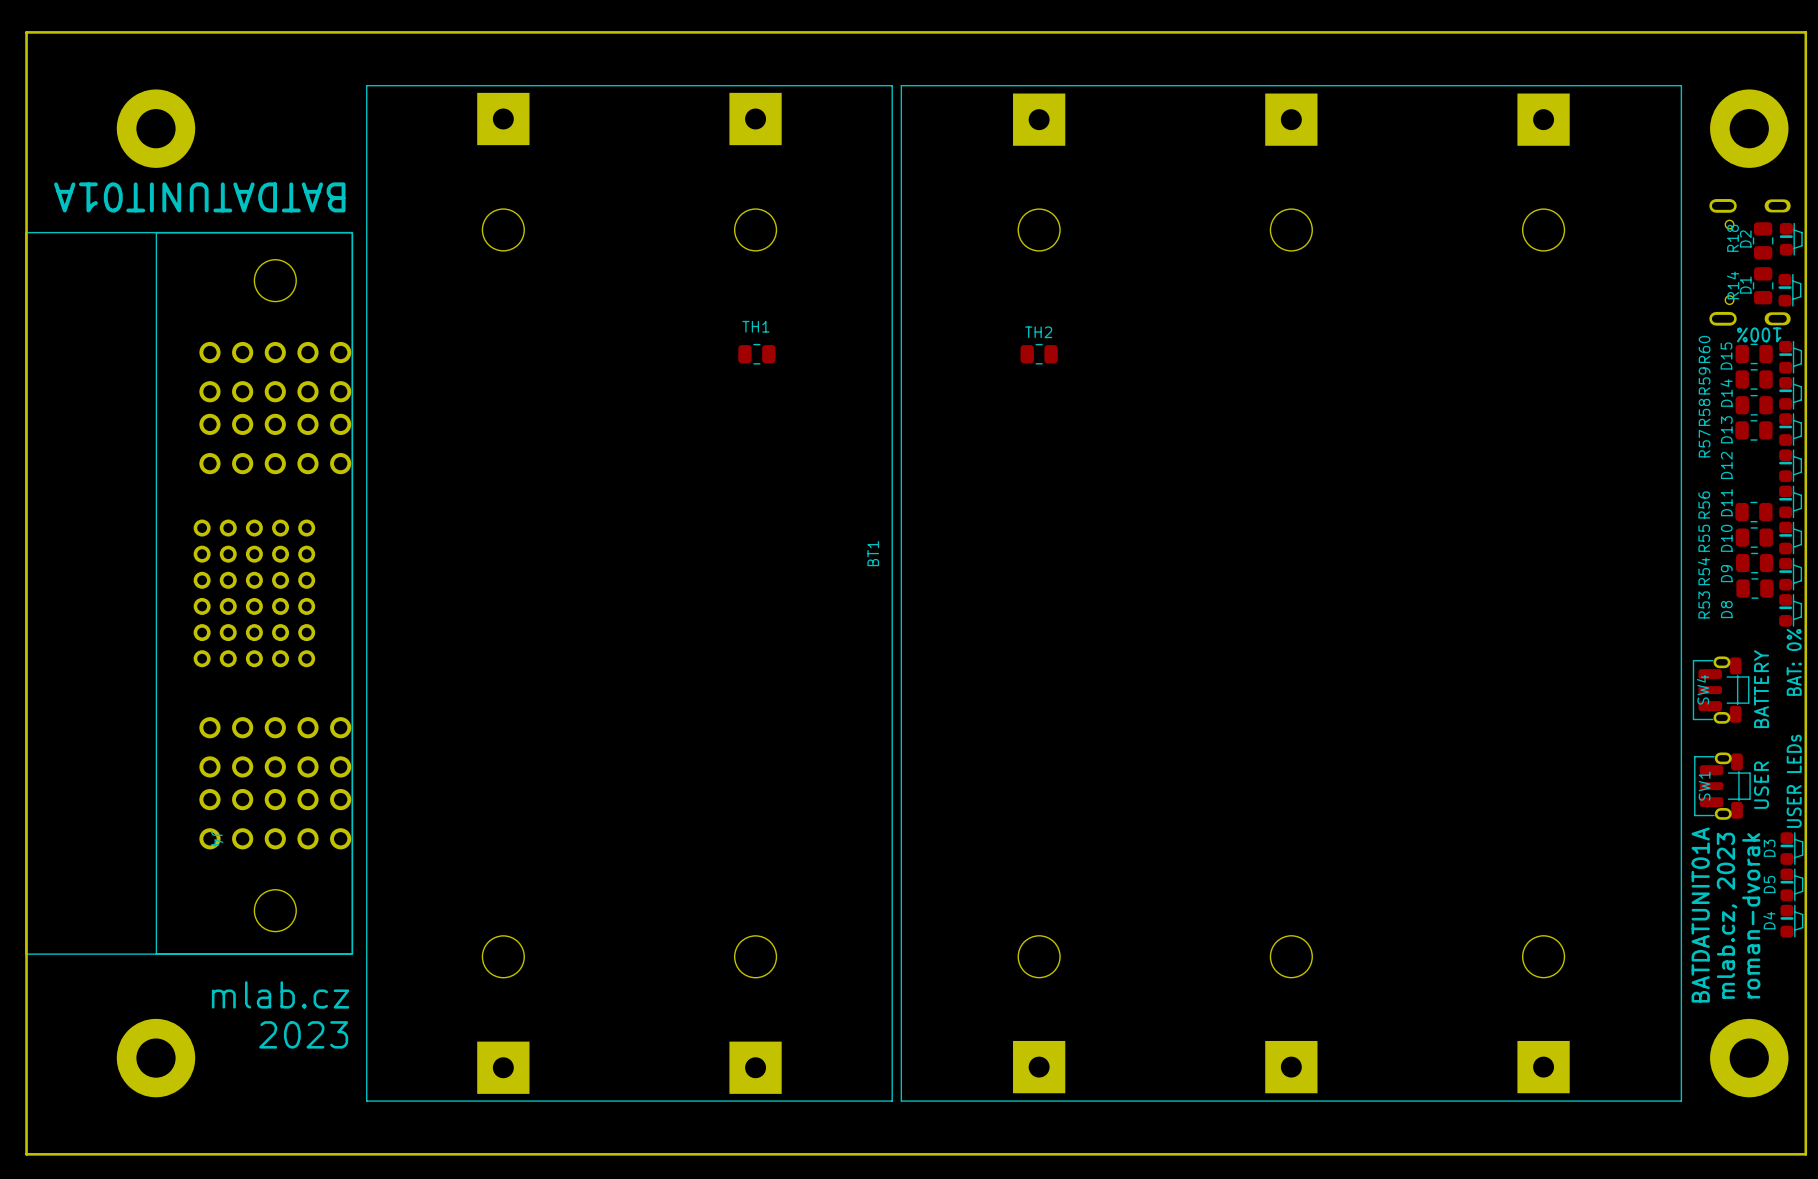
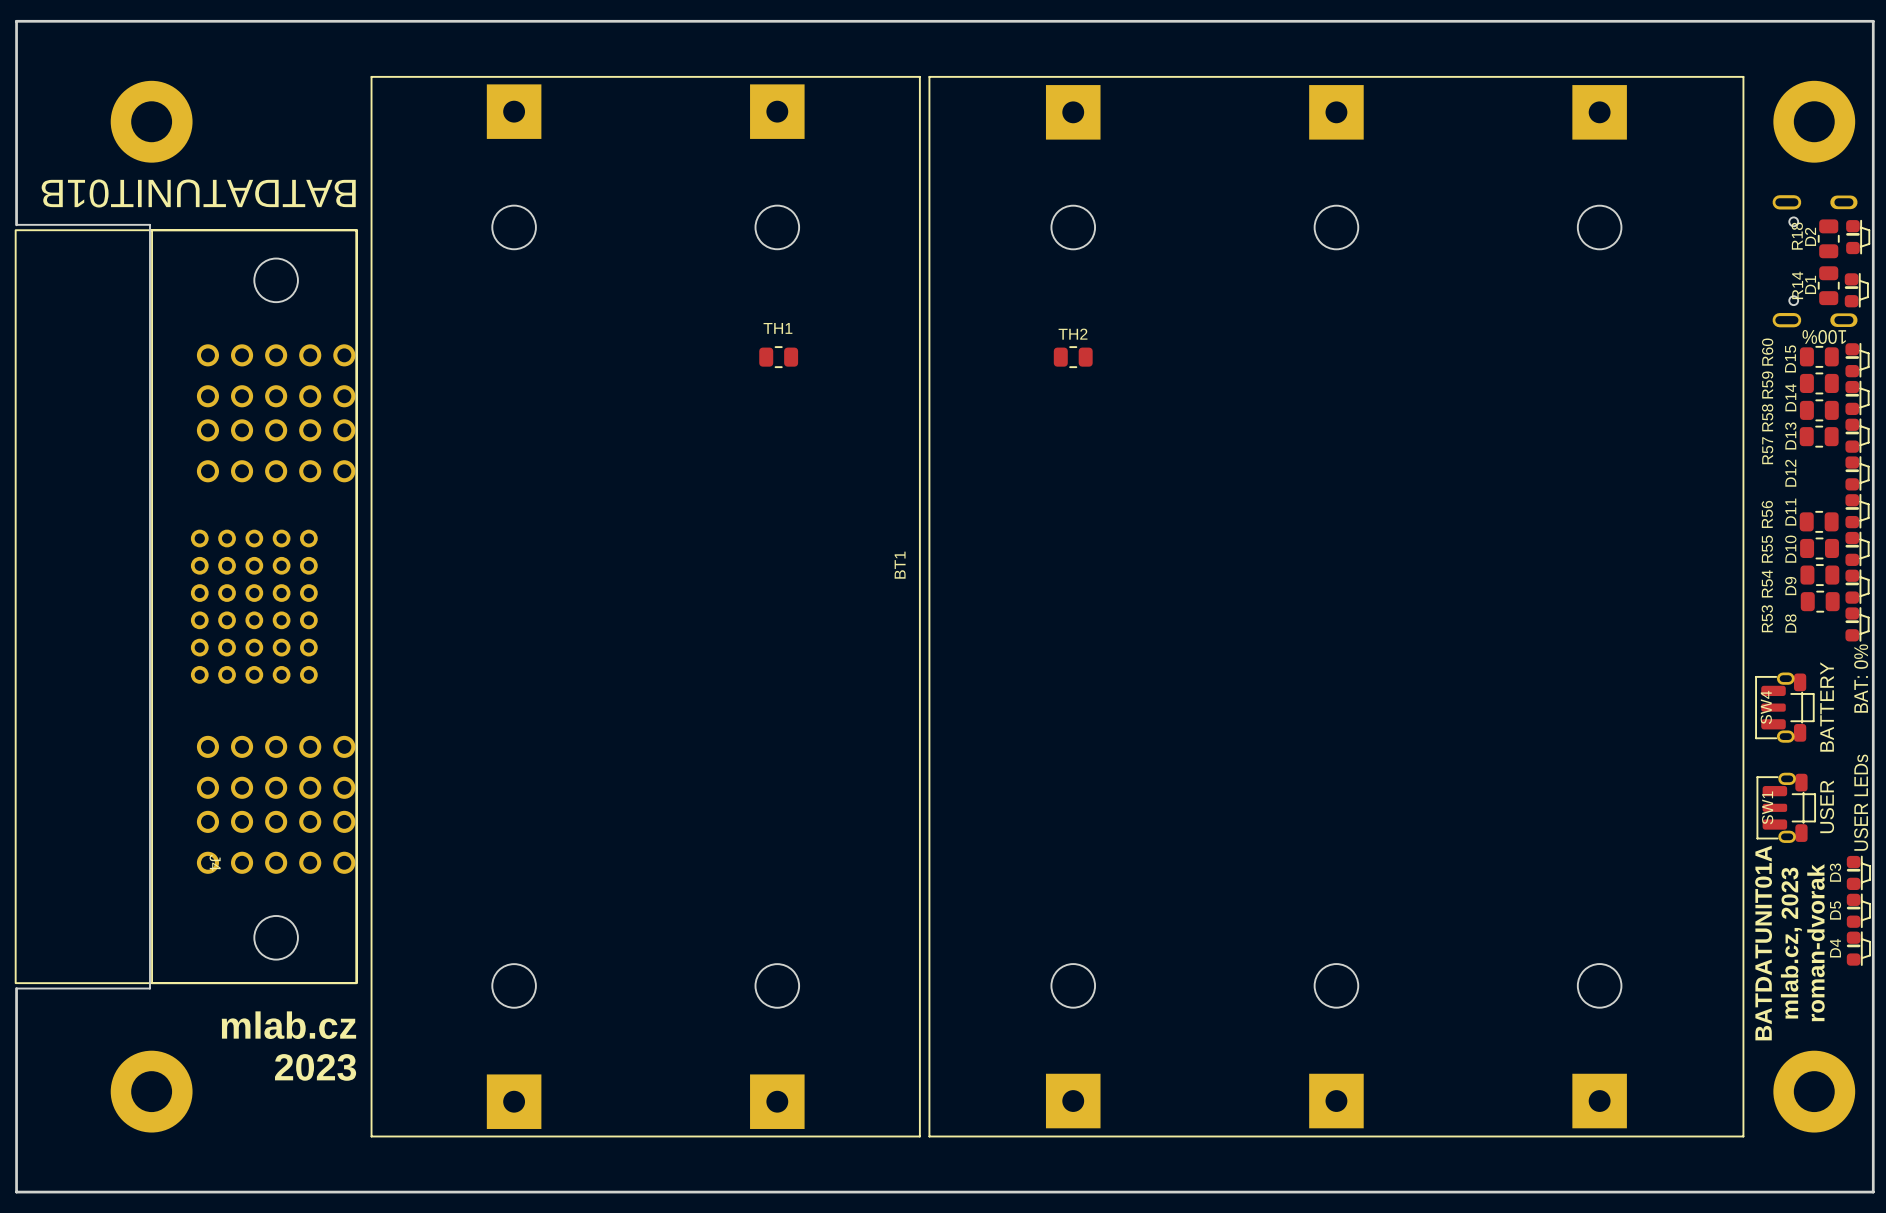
text: BATDATUNIT01A (199, 197) -> BATDATUNIT01B (198, 193)
board edge: (26, 227) (26, 959) -> (16, 224) (150, 224) (150, 988) (16, 988)

